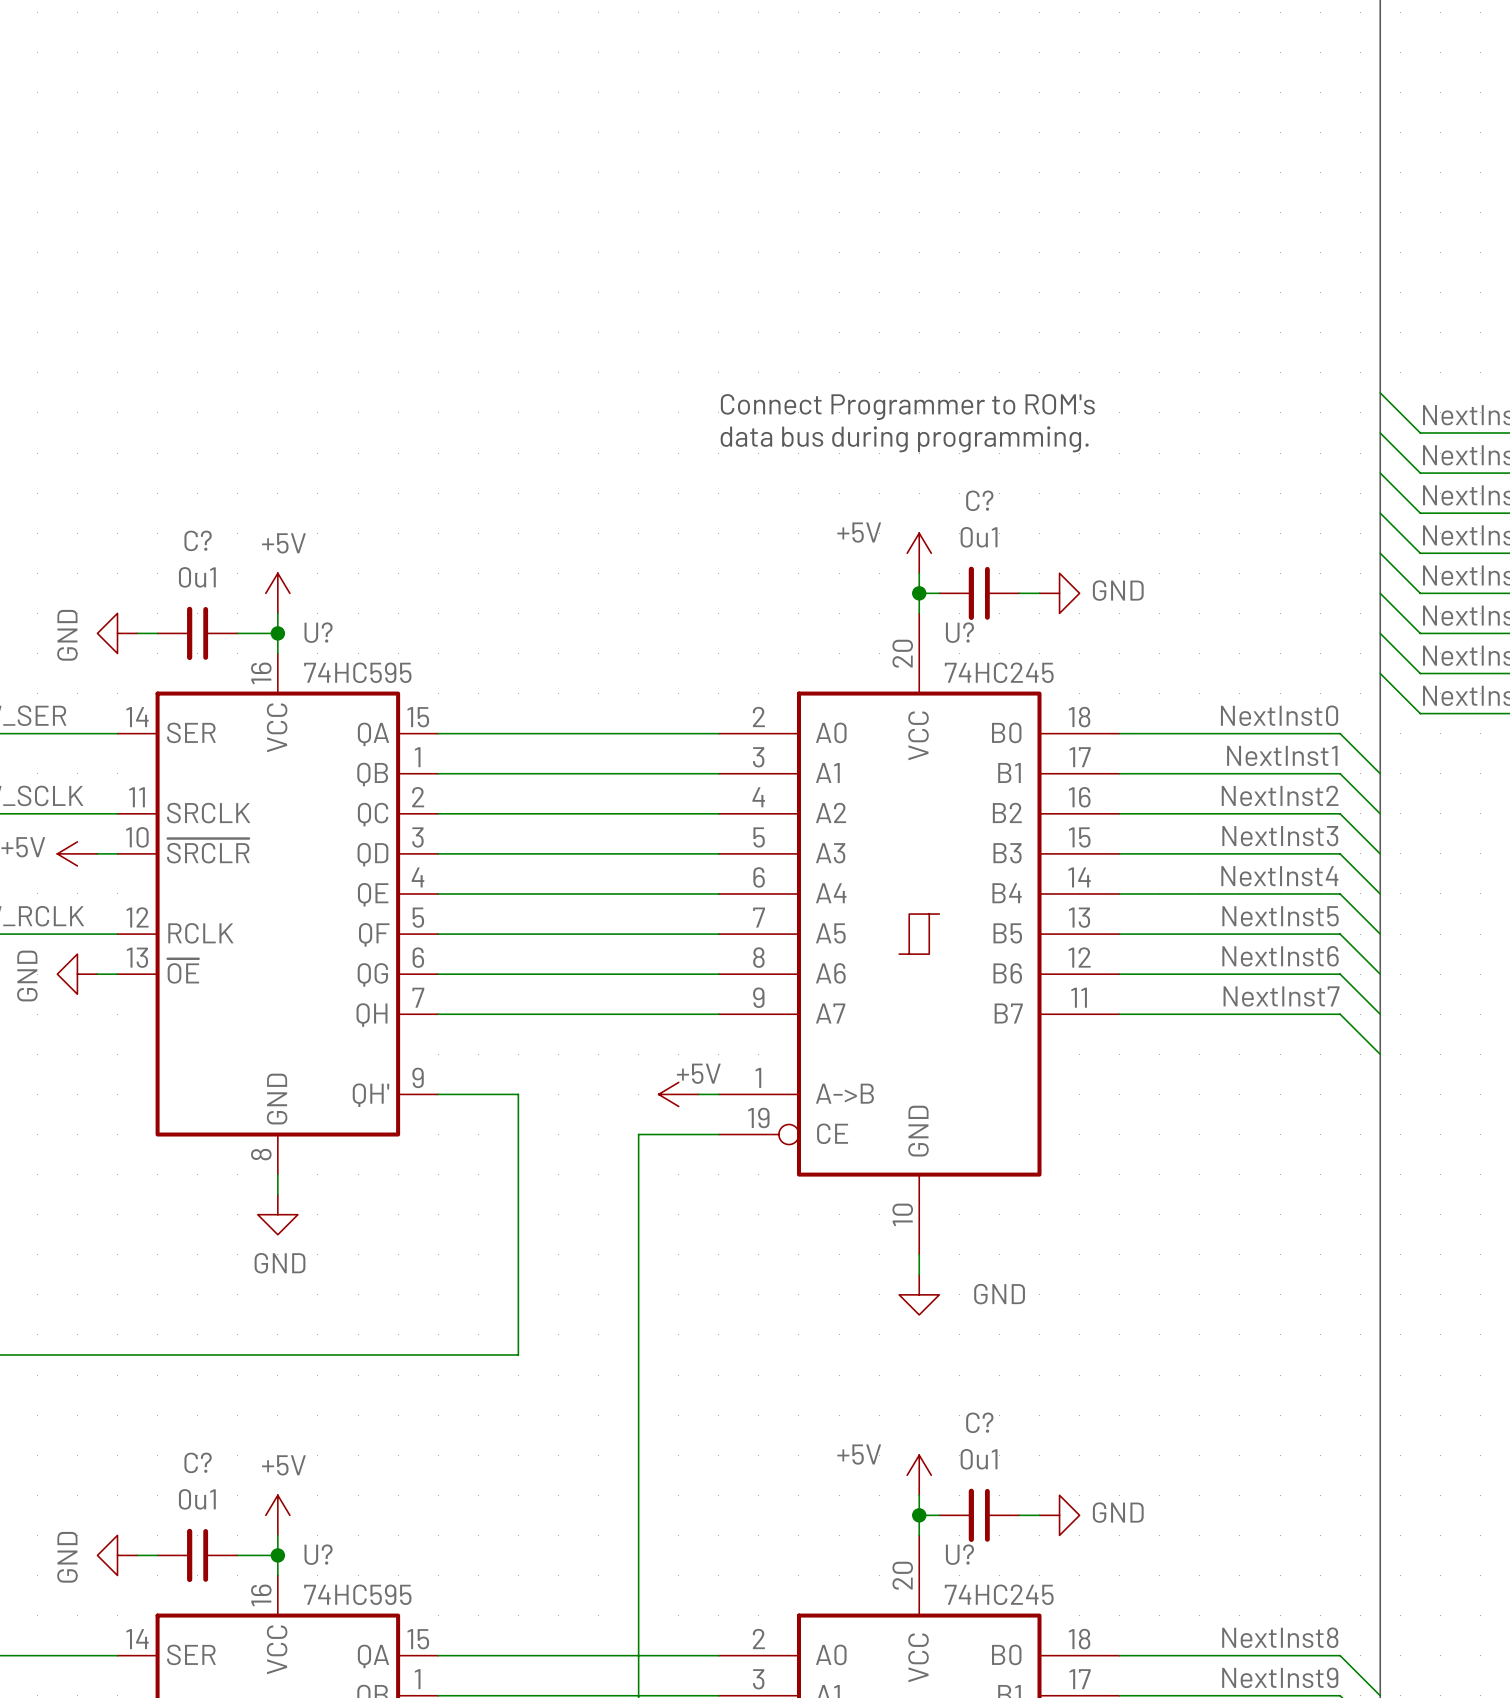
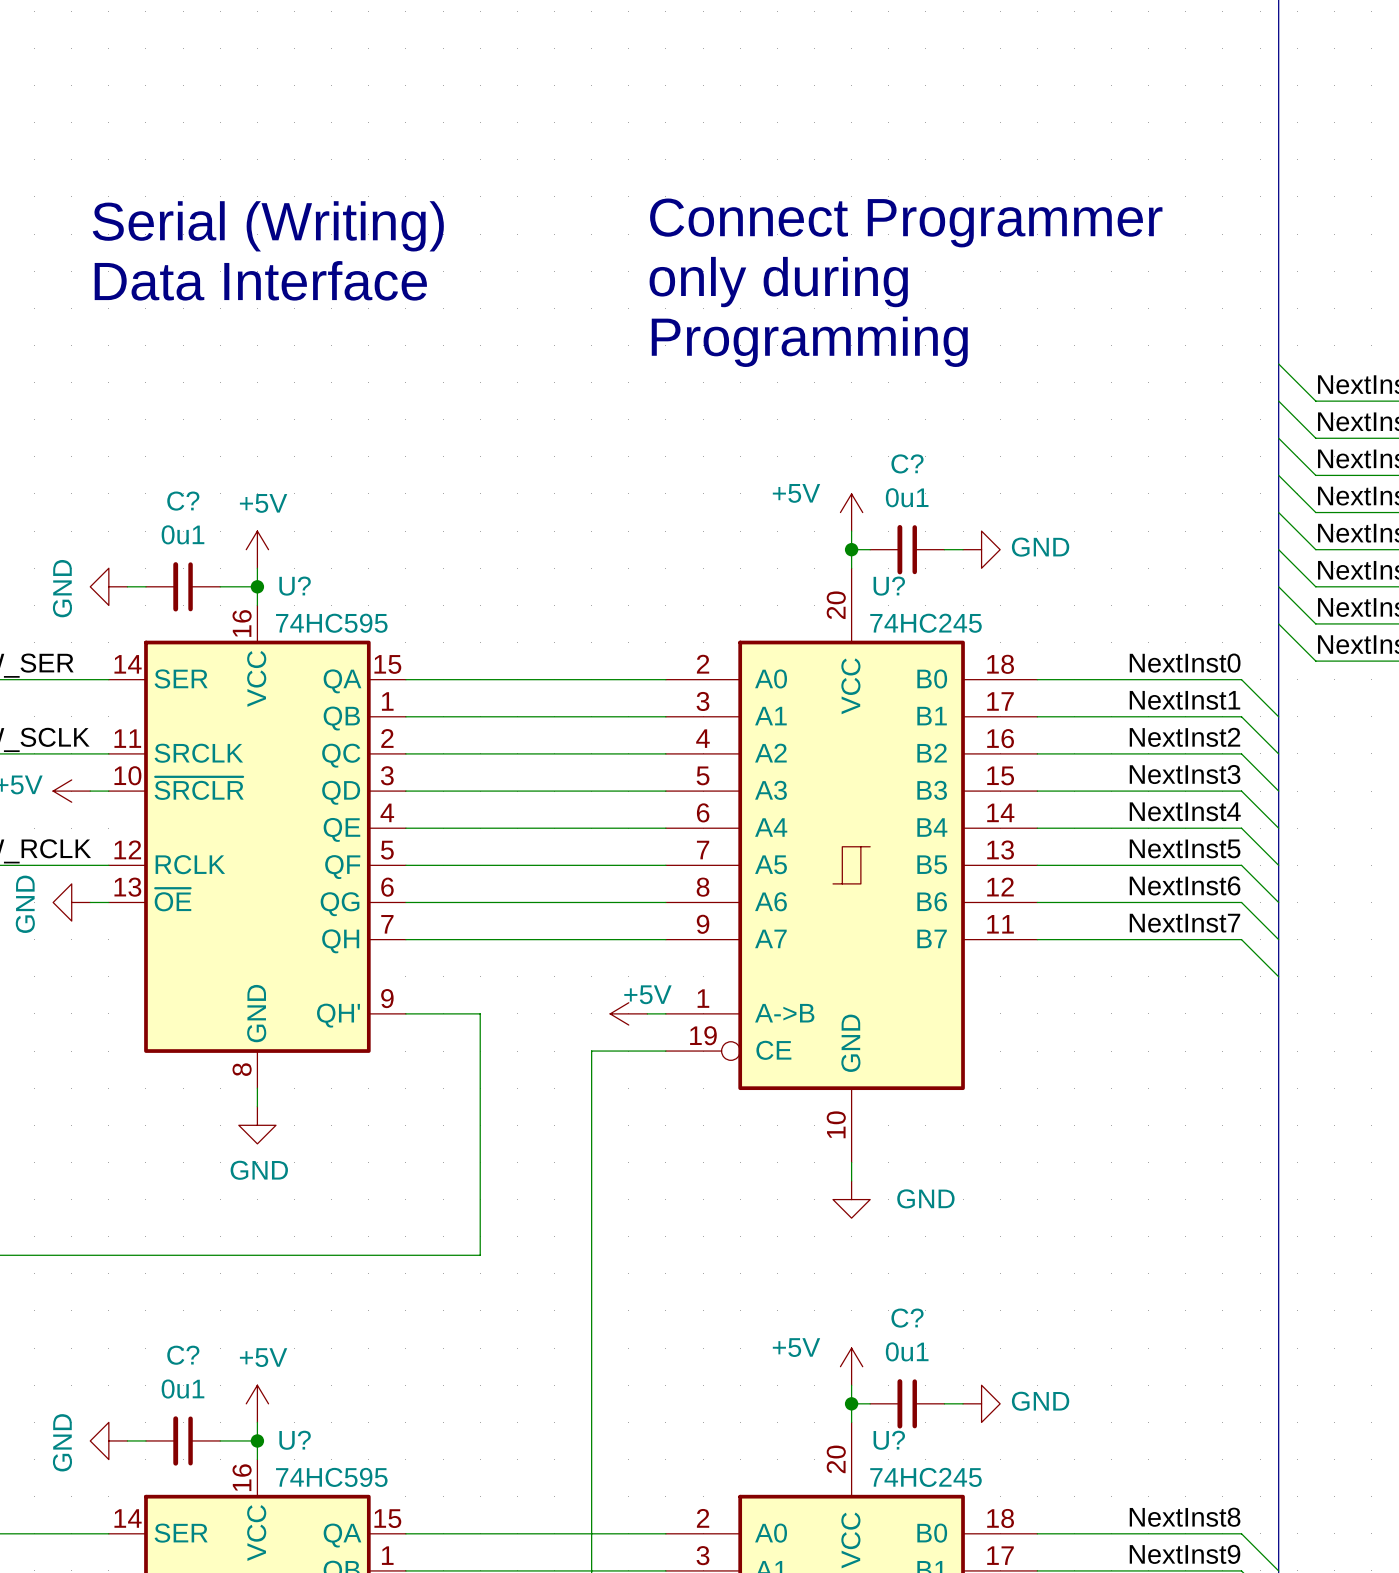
text: none -> Connect Programmer (906, 222)
text: none -> Serial (Writing) (268, 226)
text: none -> Data Interface (260, 280)
text: none -> only during (778, 282)
text: none -> Programming (809, 341)
text: Connect Programmer to ROM's (907, 407) -> none
text: data bus during programming. (904, 439) -> none

